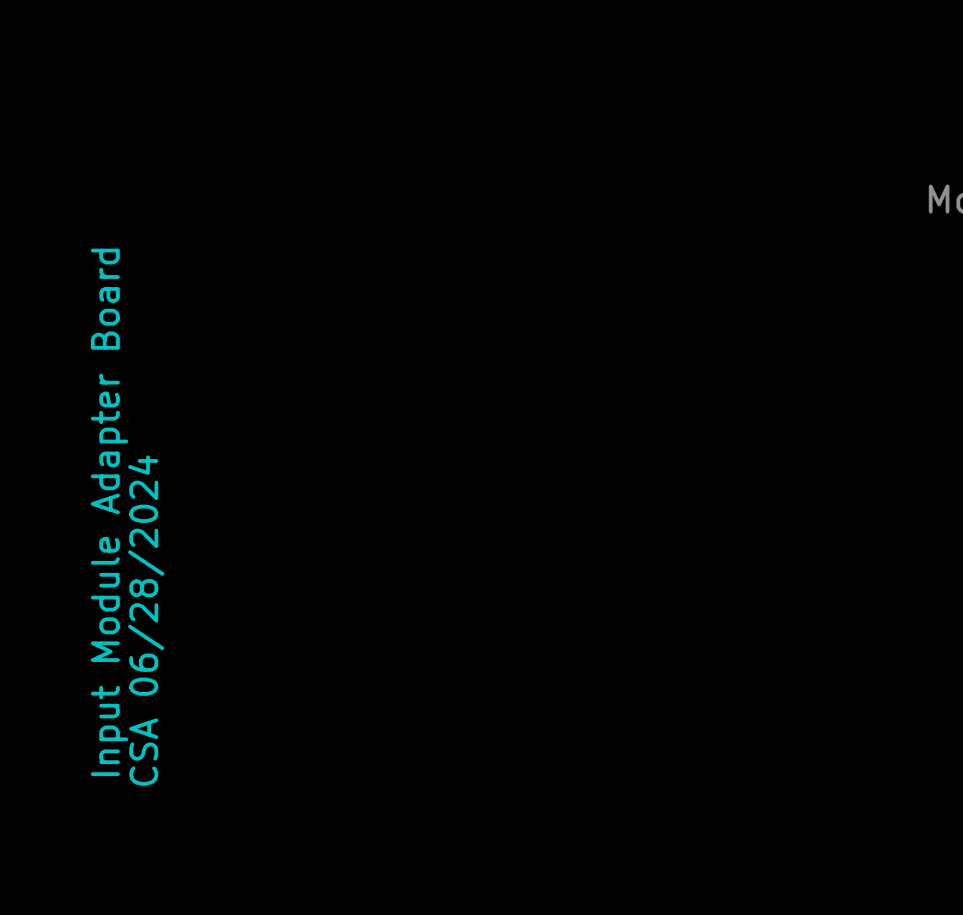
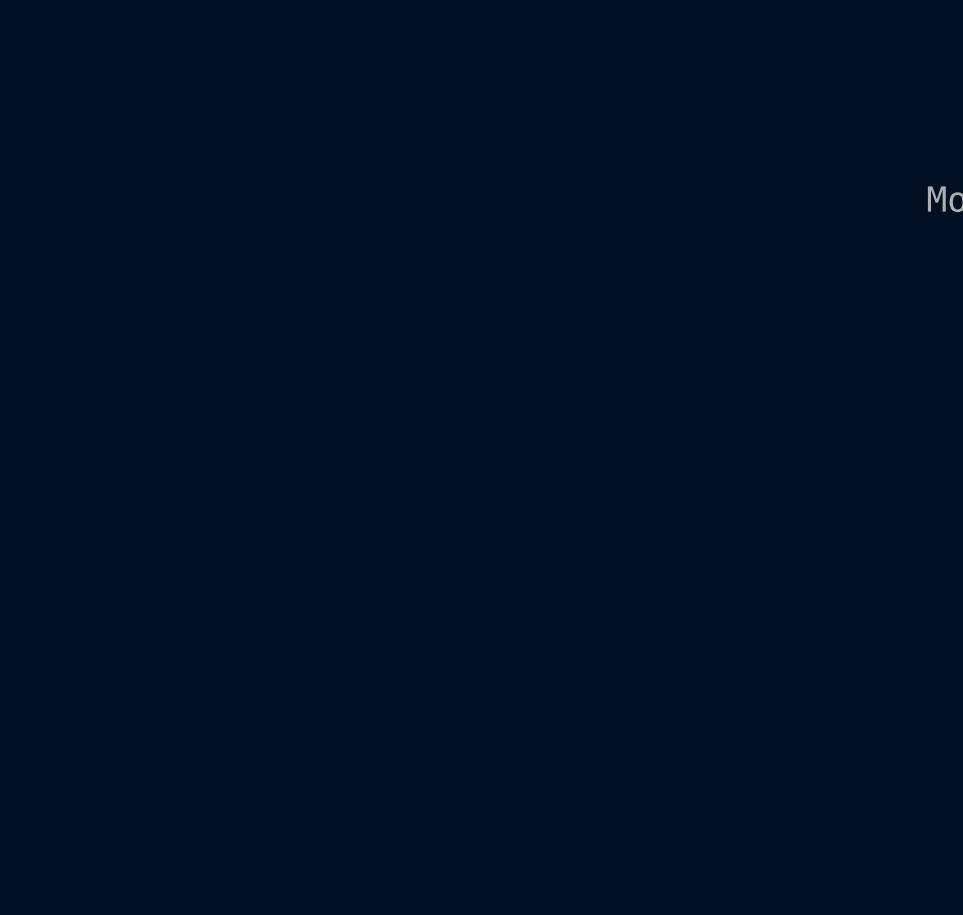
text: Input Module Adapter Board (109, 512) -> none
text: CSA 06/28/2024 (146, 620) -> none

